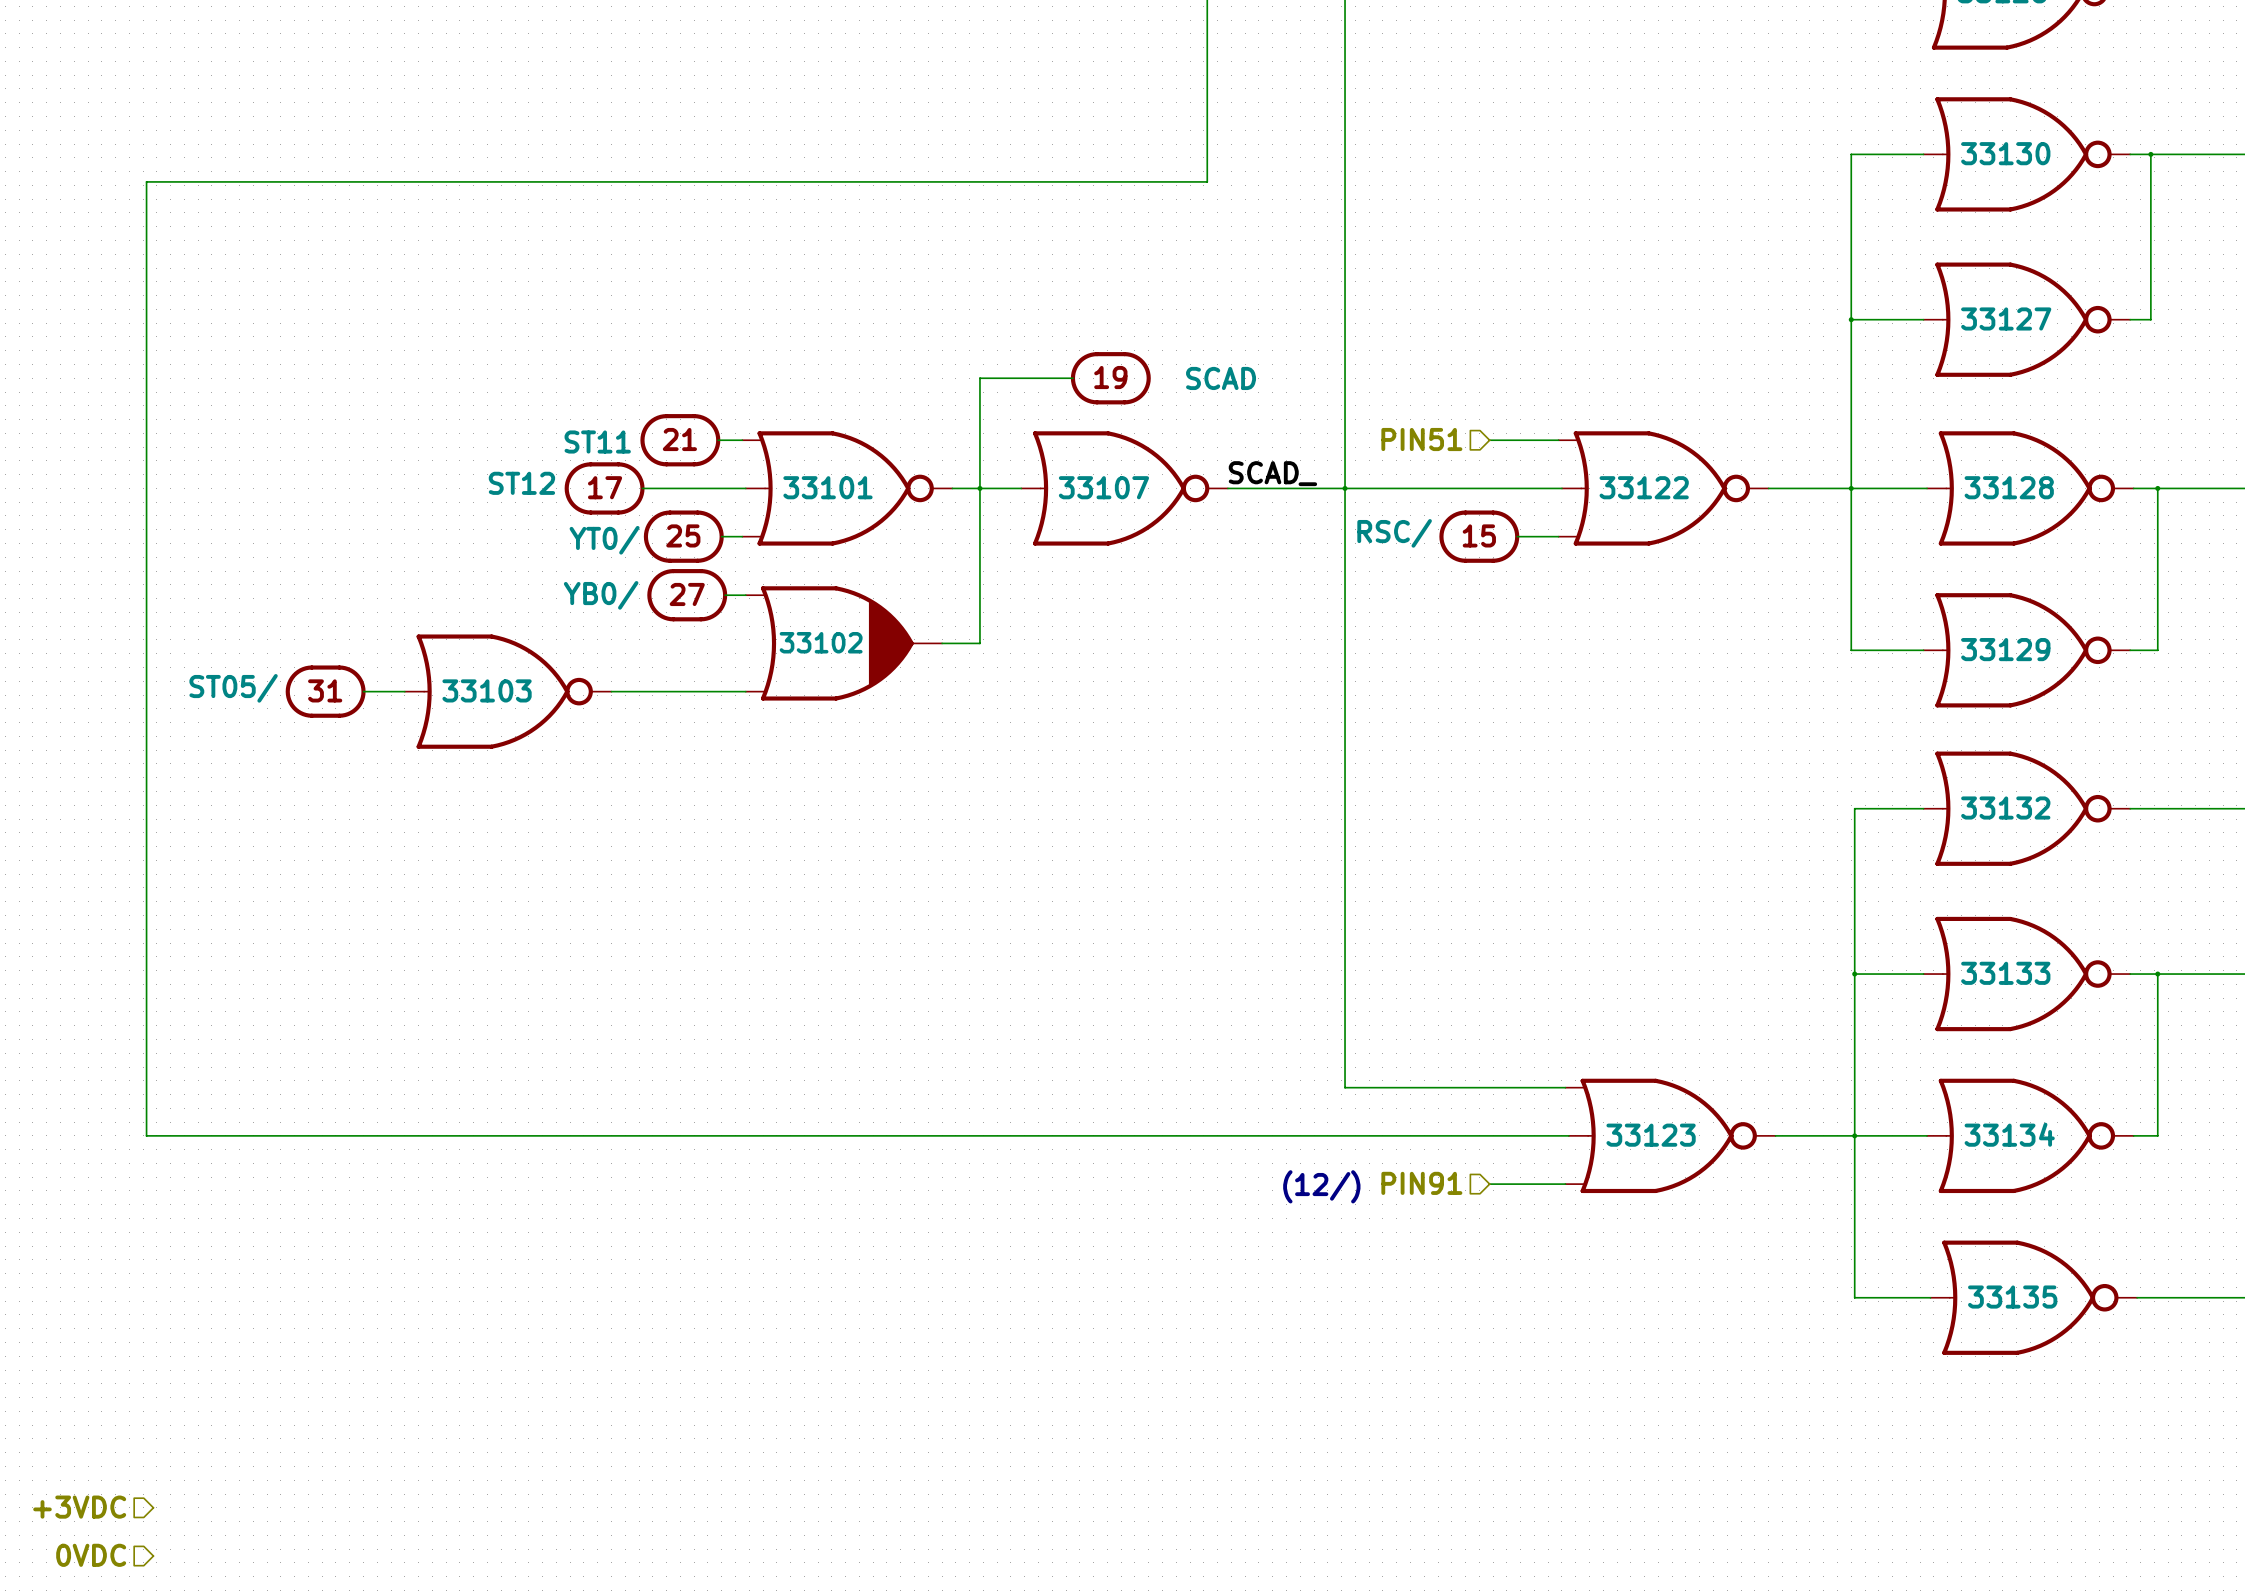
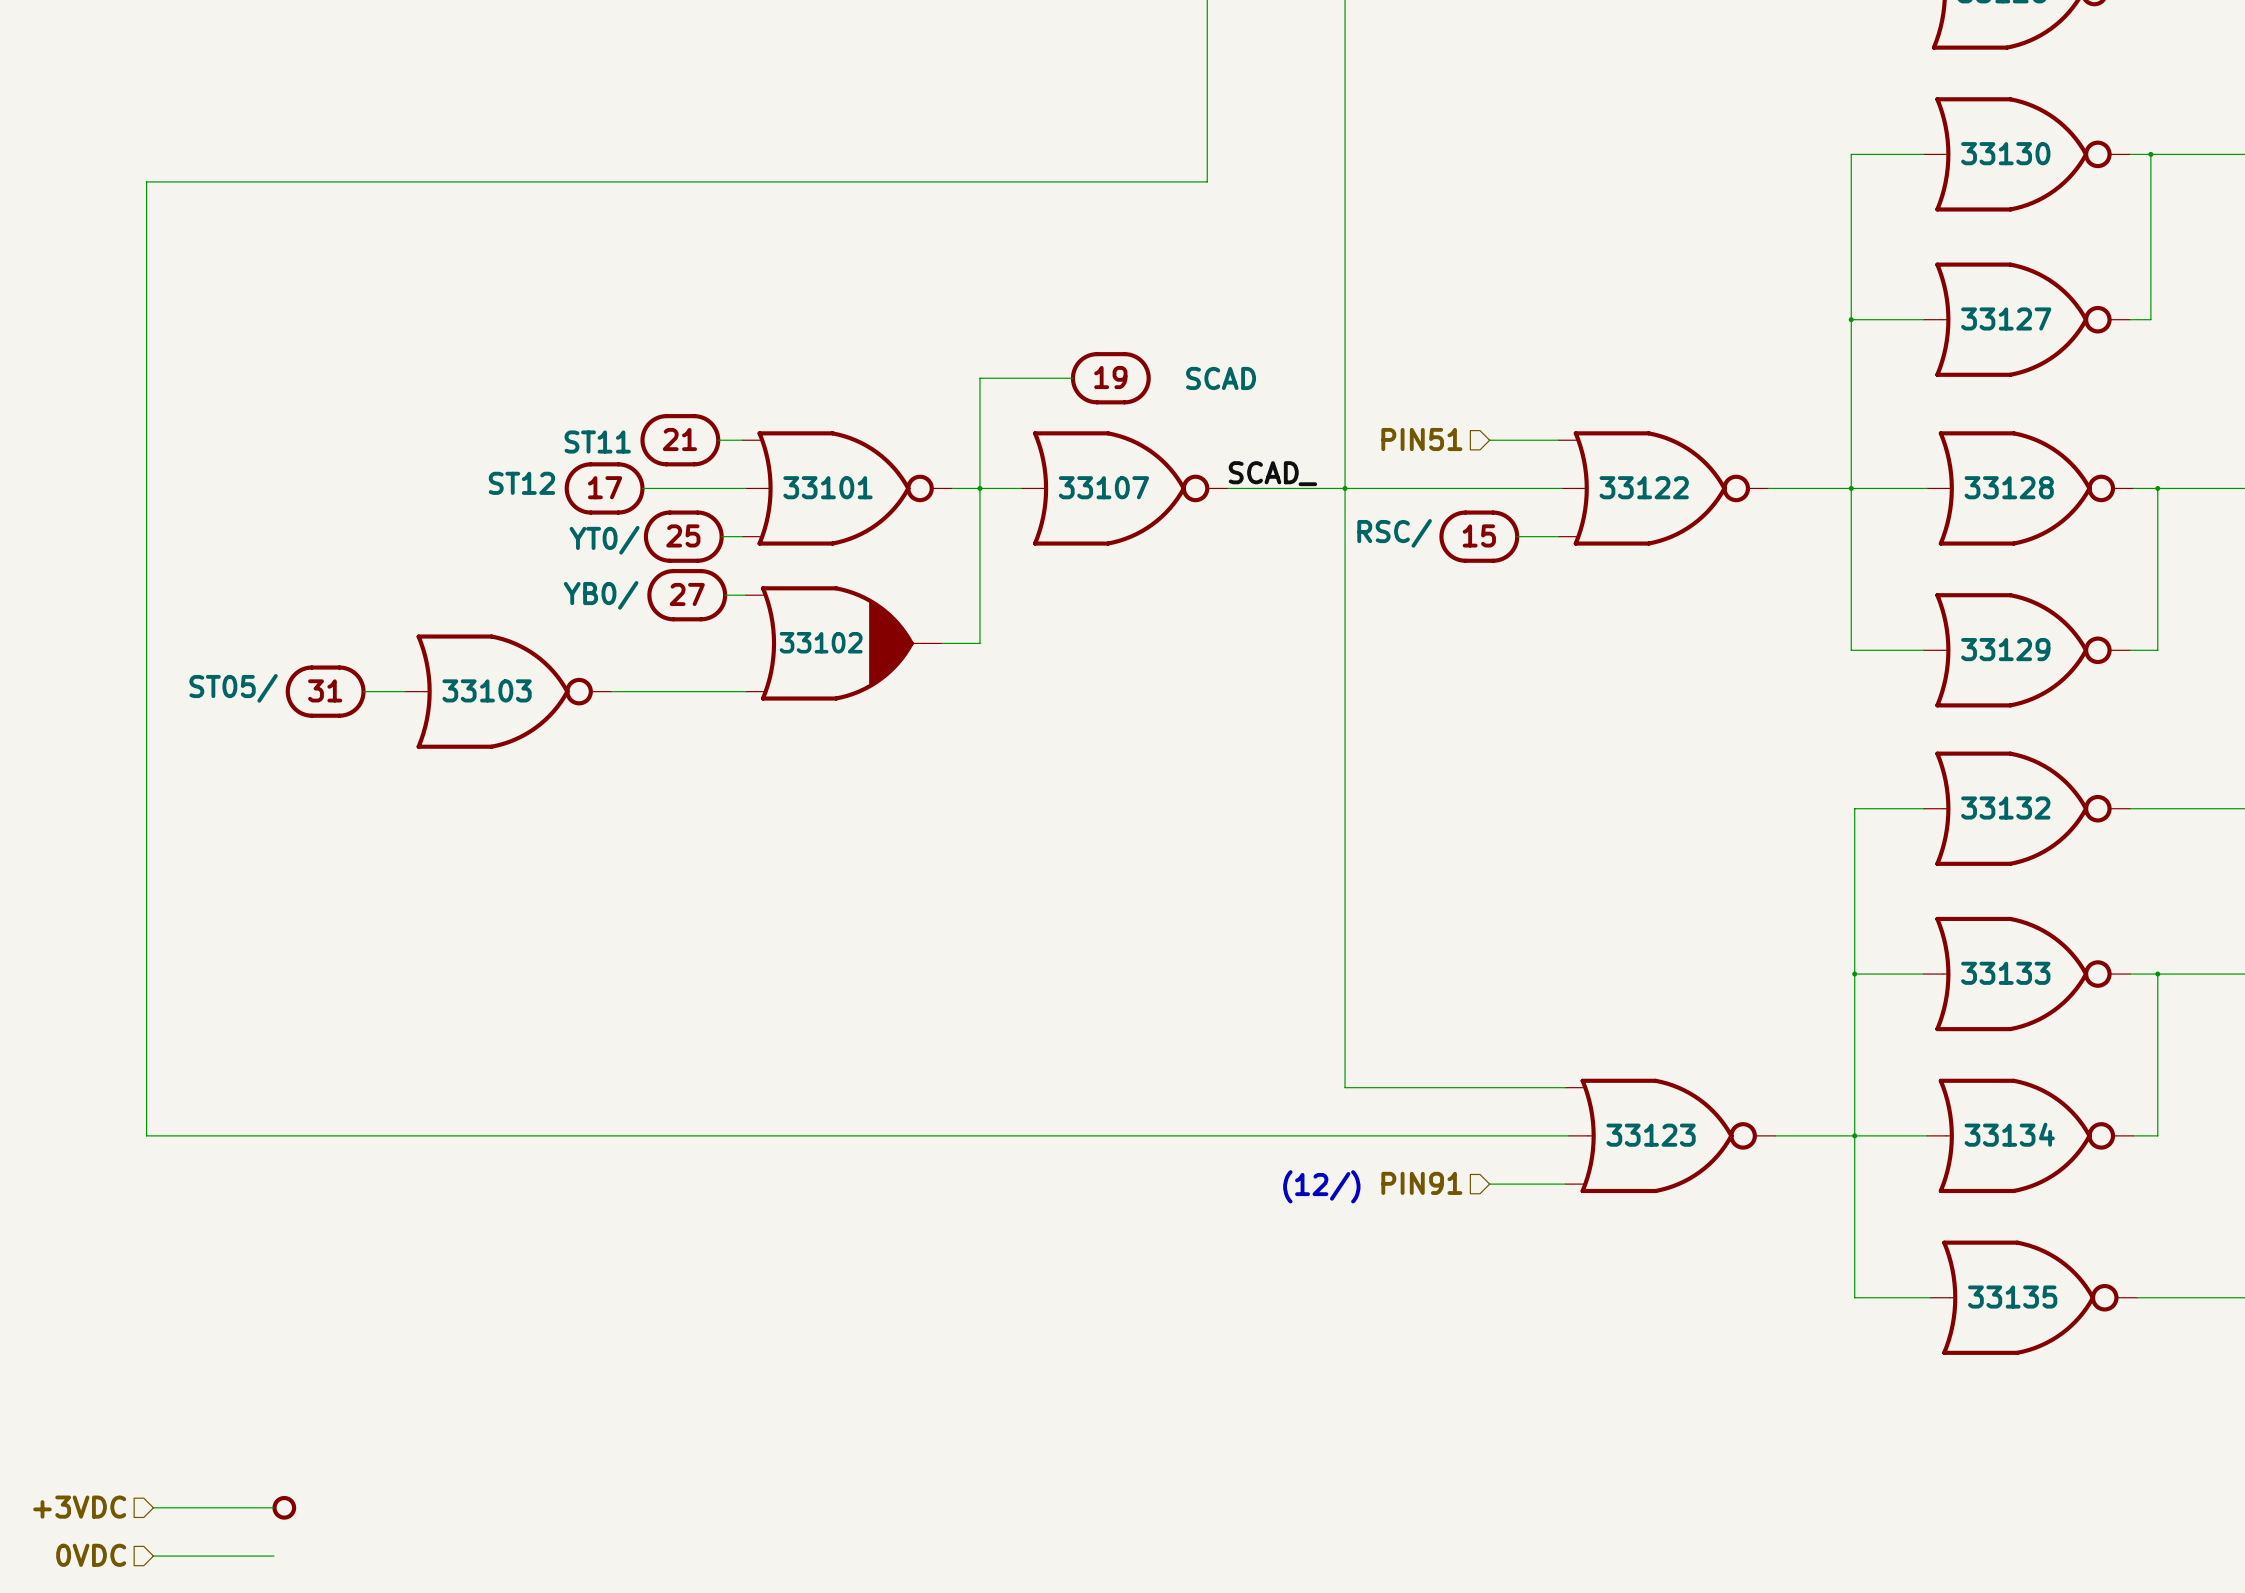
wire: none -> (153, 1507) (273, 1507)
part: none -> (284, 1507)
wire: none -> (153, 1556) (273, 1556)

